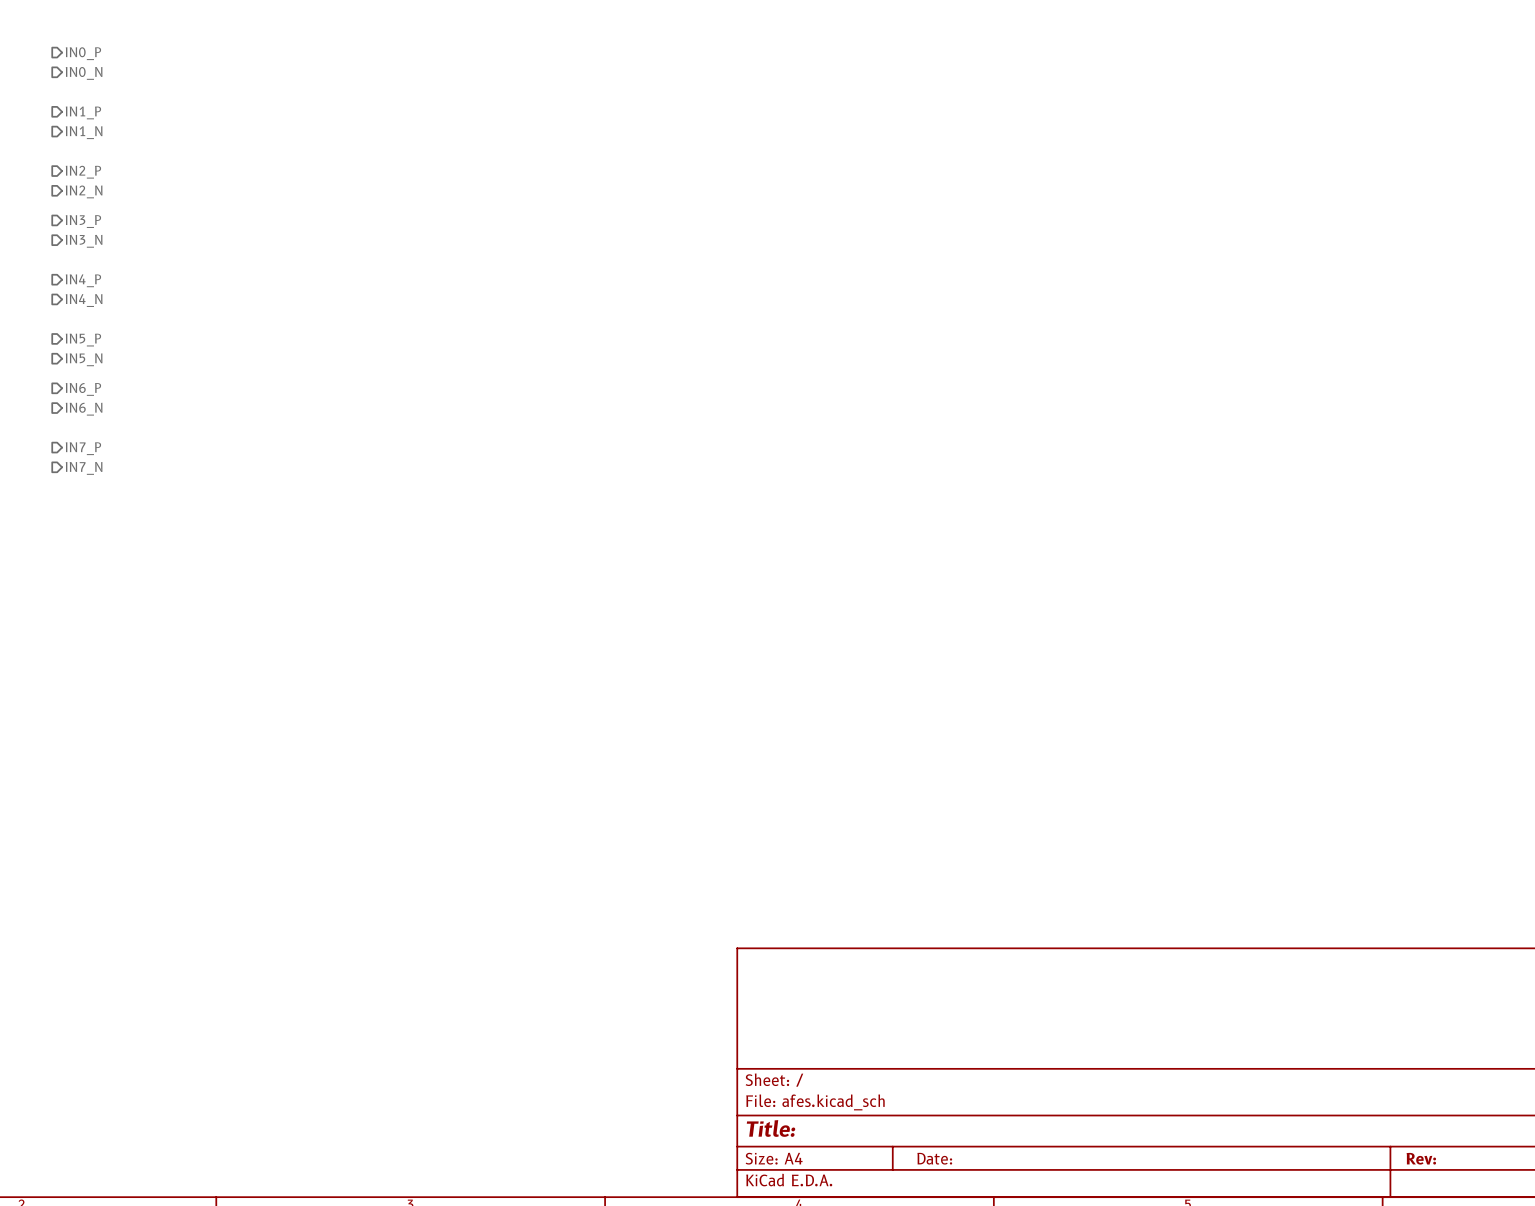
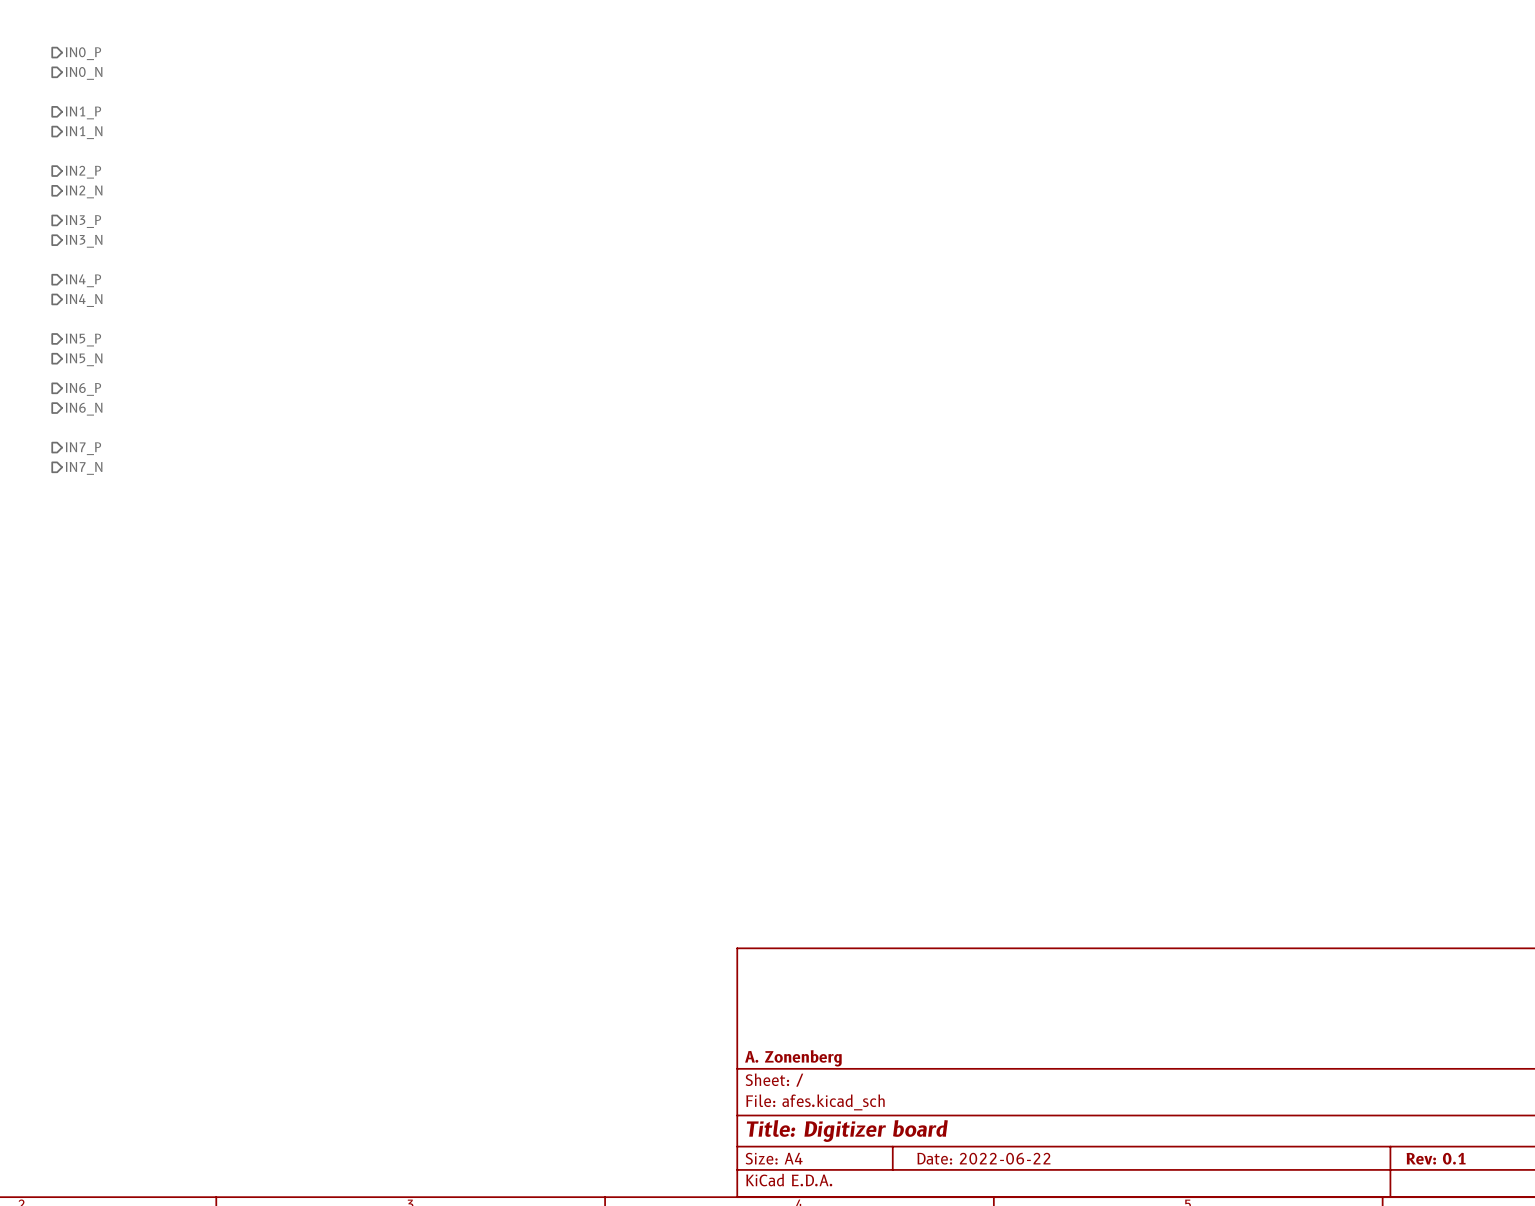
title block: none -> A. Zonenberg (793, 1058)
title block: Title: (771, 1128) -> Title: Digitizer board (847, 1131)
title block: Date: (934, 1158) -> Date: 2022-06-22 (983, 1158)
title block: Rev: (1421, 1158) -> Rev: 0.1 (1436, 1158)

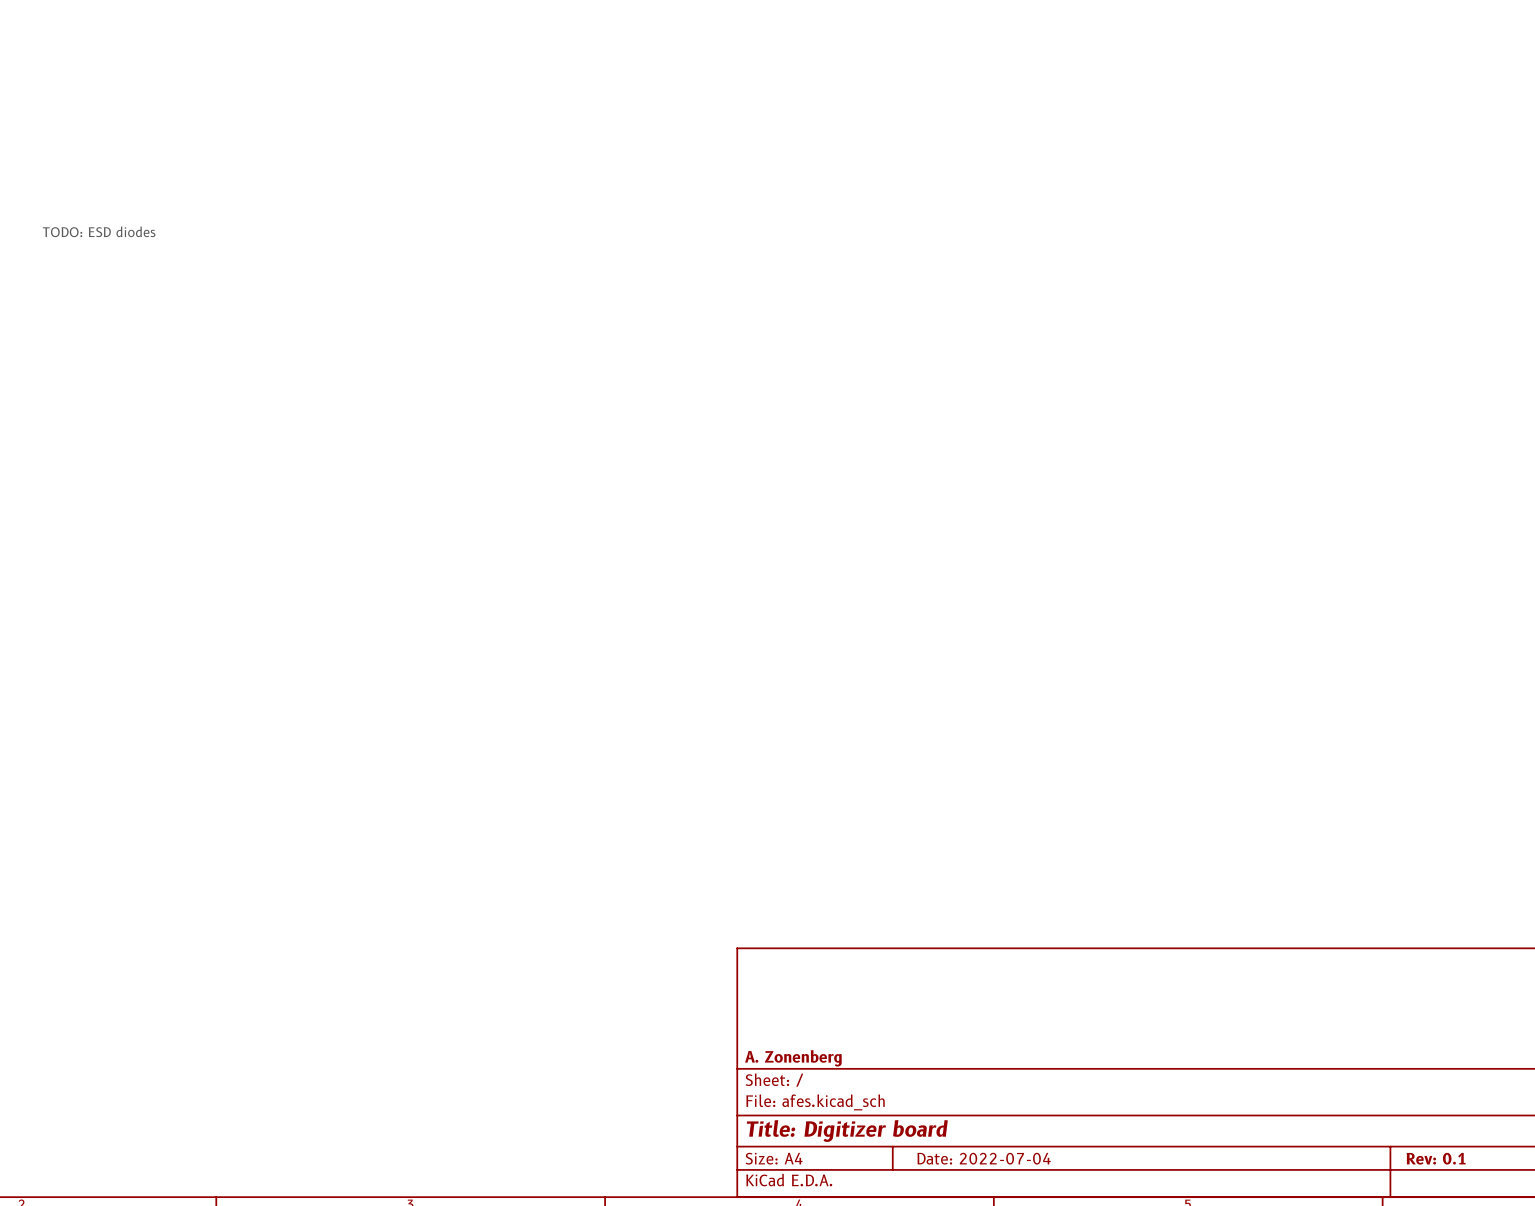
hierarchical label: IN0_P (83, 53) -> none
hierarchical label: IN0_N (84, 73) -> none
hierarchical label: IN1_P (83, 112) -> none
hierarchical label: IN1_N (84, 132) -> none
hierarchical label: IN2_P (83, 172) -> none
hierarchical label: IN2_N (84, 191) -> none
hierarchical label: IN3_P (83, 221) -> none
text: none -> TODO: ESD diodes (99, 231)
hierarchical label: IN3_N (84, 241) -> none
hierarchical label: IN4_P (83, 280) -> none
hierarchical label: IN4_N (84, 300) -> none
hierarchical label: IN5_P (83, 340) -> none
hierarchical label: IN5_N (84, 359) -> none
hierarchical label: IN6_P (83, 389) -> none
hierarchical label: IN6_N (84, 409) -> none
hierarchical label: IN7_P (83, 448) -> none
hierarchical label: IN7_N (84, 468) -> none
title block: Date: 2022-06-22 (983, 1158) -> Date: 2022-07-04 (984, 1158)

